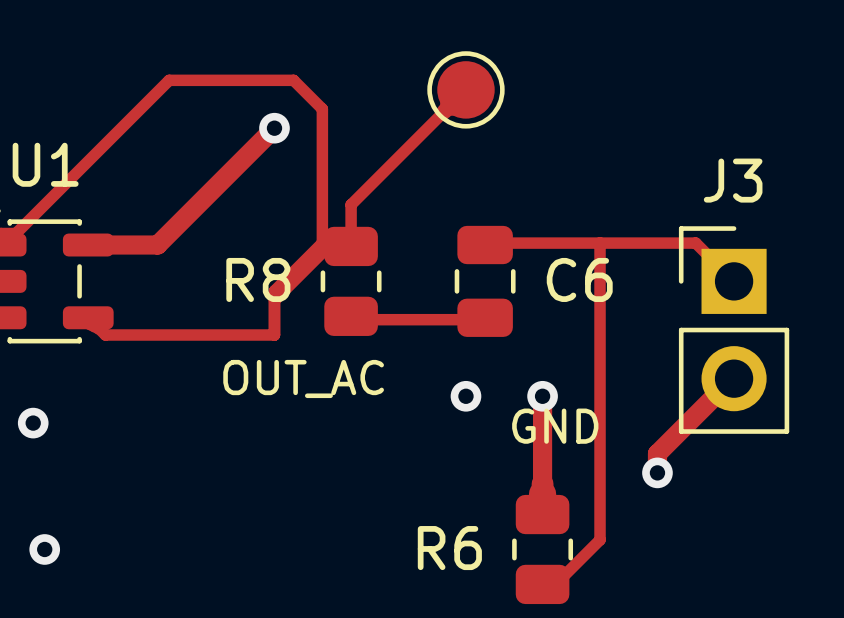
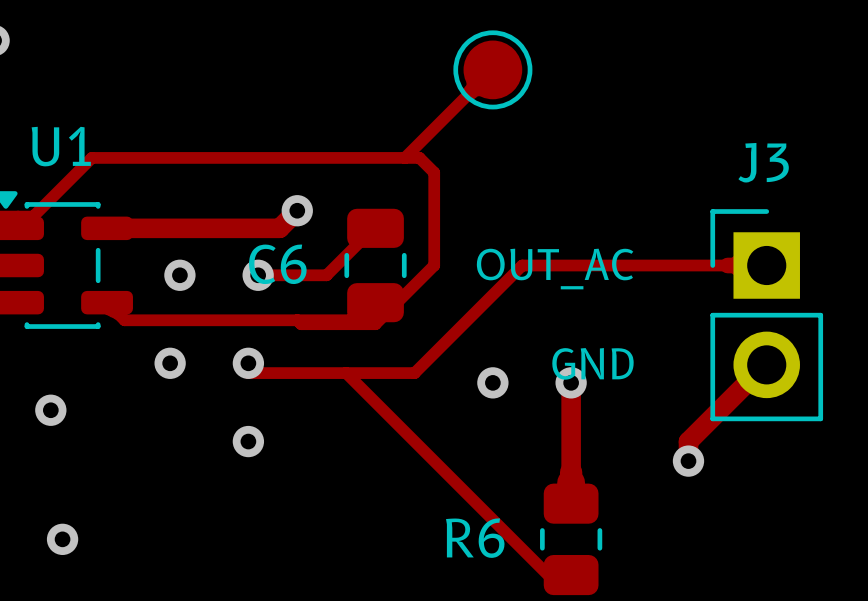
track: (274, 128) (157, 245) -> (297, 210) (279, 228) (177, 228)
via: (274, 128) -> none
track: (73, 176) (169, 80) (293, 80) (322, 109) (322, 243) (274, 290) (274, 335) -> (91, 157) (419, 157) (434, 172) (434, 265) (375, 324) (301, 324) (297, 320) (350, 320) (365, 304) (373, 304) (375, 302)
track: (379, 176) (351, 204) (351, 243) (331, 243) (274, 300) -> none
via: none -> (297, 210)
track: (600, 243) (600, 539) (552, 587) (548, 584) (542, 584) -> (346, 373) (551, 578) (561, 578) (564, 575) (571, 575)
track: none -> (375, 228) (326, 275) (258, 275)
track: (485, 245) (492, 245) (494, 243) (695, 243) (734, 281) -> (248, 363) (248, 373) (414, 373) (522, 265) (766, 265)
C6 name position: C6 (579, 279) -> C6 (277, 264)
R8: (351, 281) -> none
C6 position: (485, 281) -> (375, 265)
via: none -> (179, 275)
via: none -> (258, 275)
track: (351, 316) (357, 316) (360, 319) (483, 319) (485, 317) -> none
via: none -> (170, 363)
via: none -> (248, 363)
text position: OUT_AC (303, 378) -> OUT_AC (555, 269)
text position: GND (555, 426) -> GND (592, 363)
via: none -> (248, 441)

